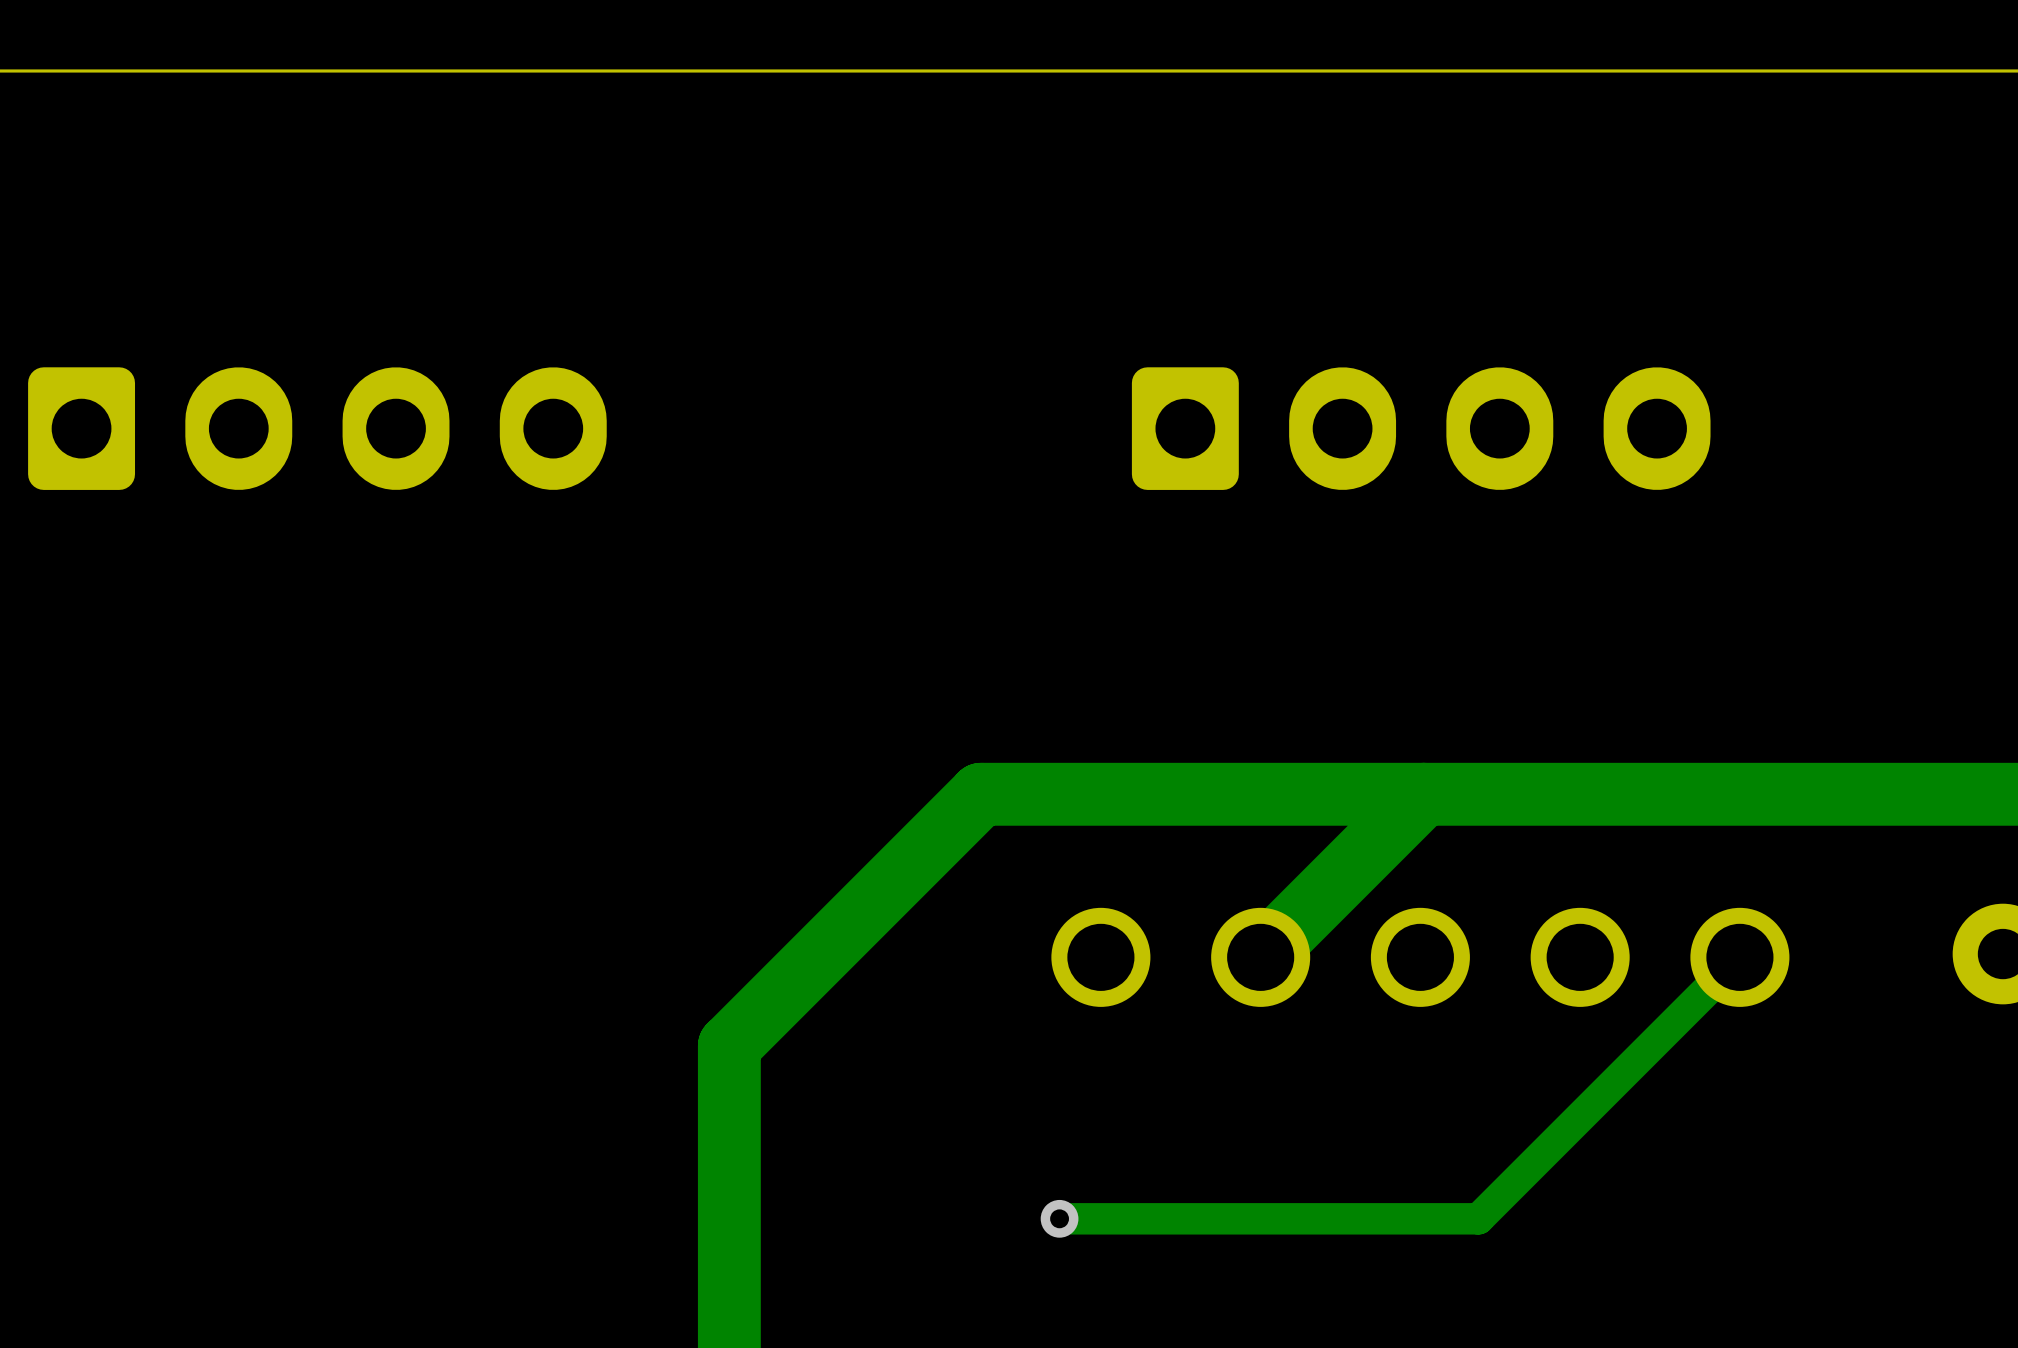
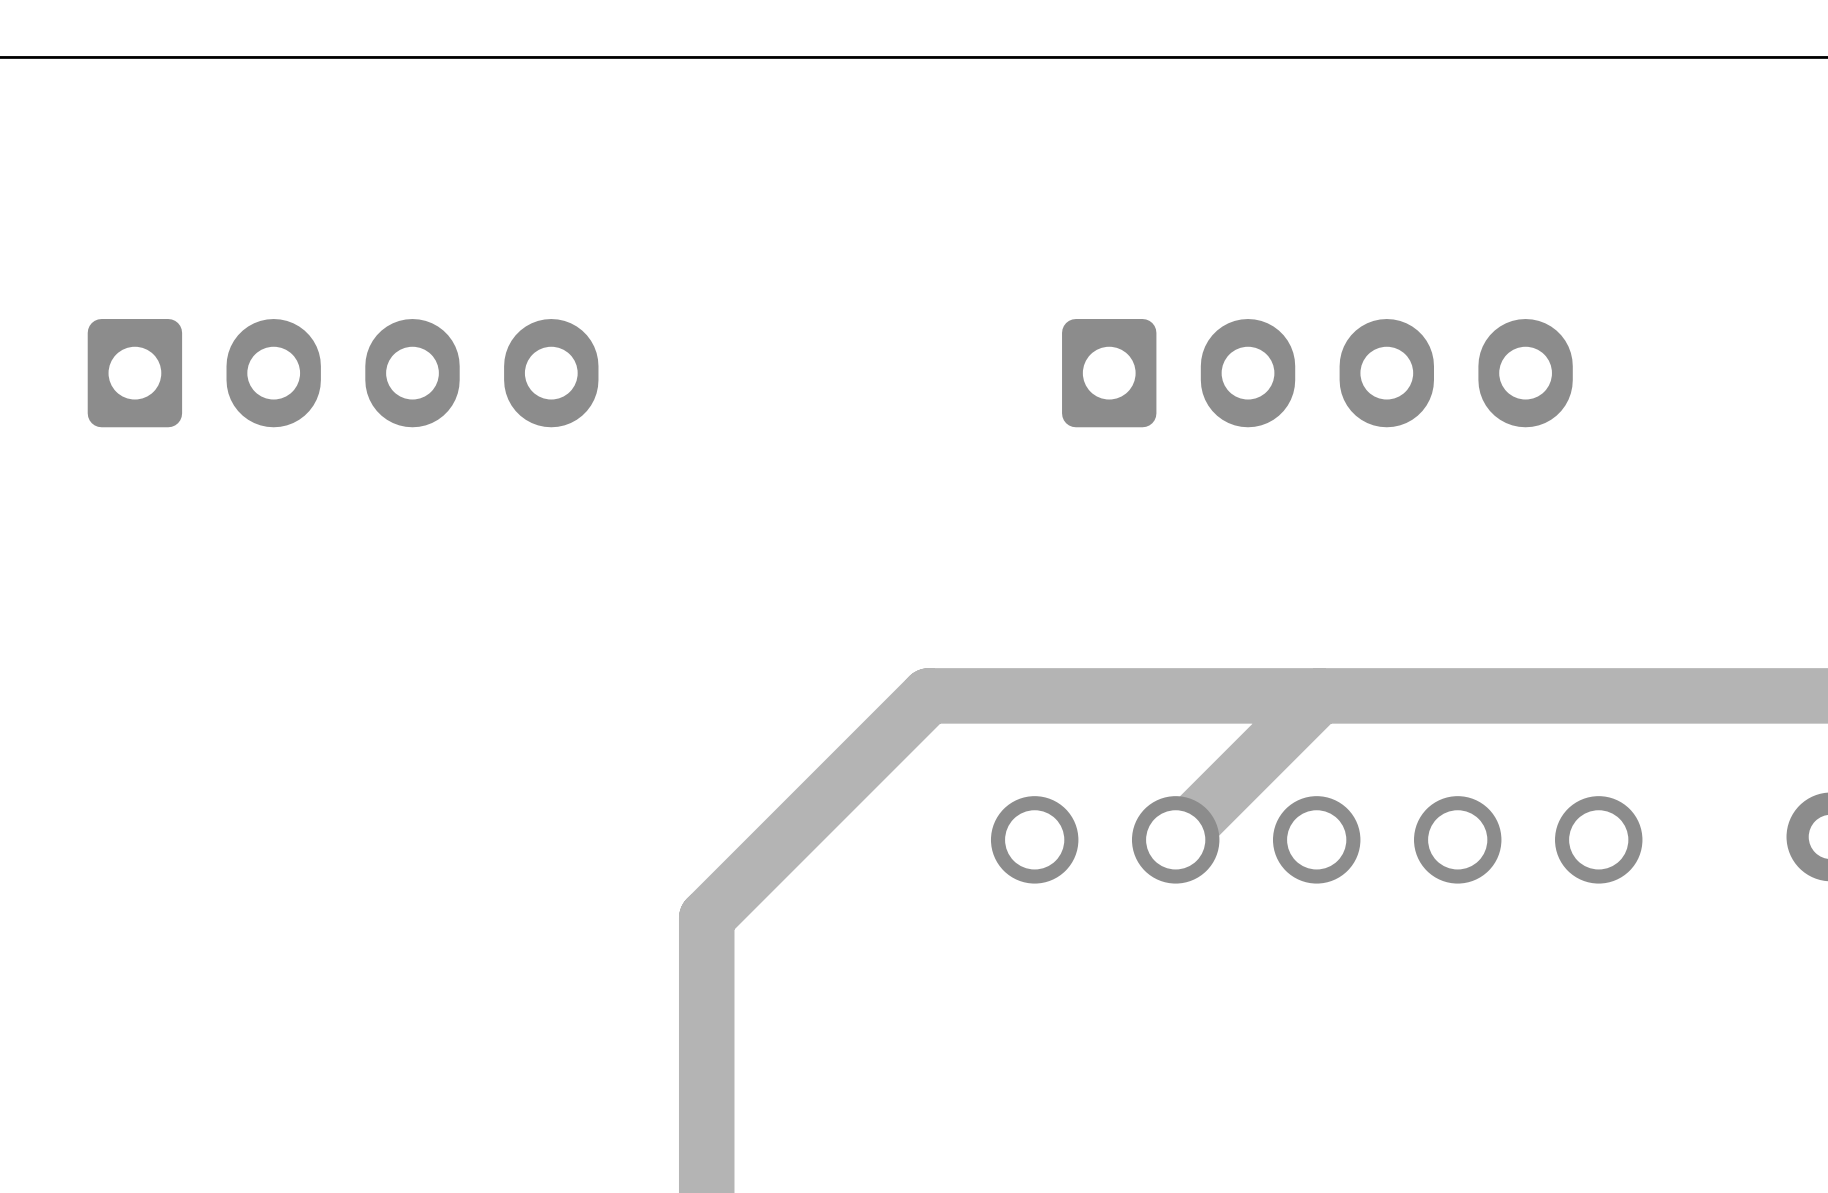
track: (1739, 957) (1478, 1218) (1059, 1218) -> none
via: (1059, 1218) -> none

